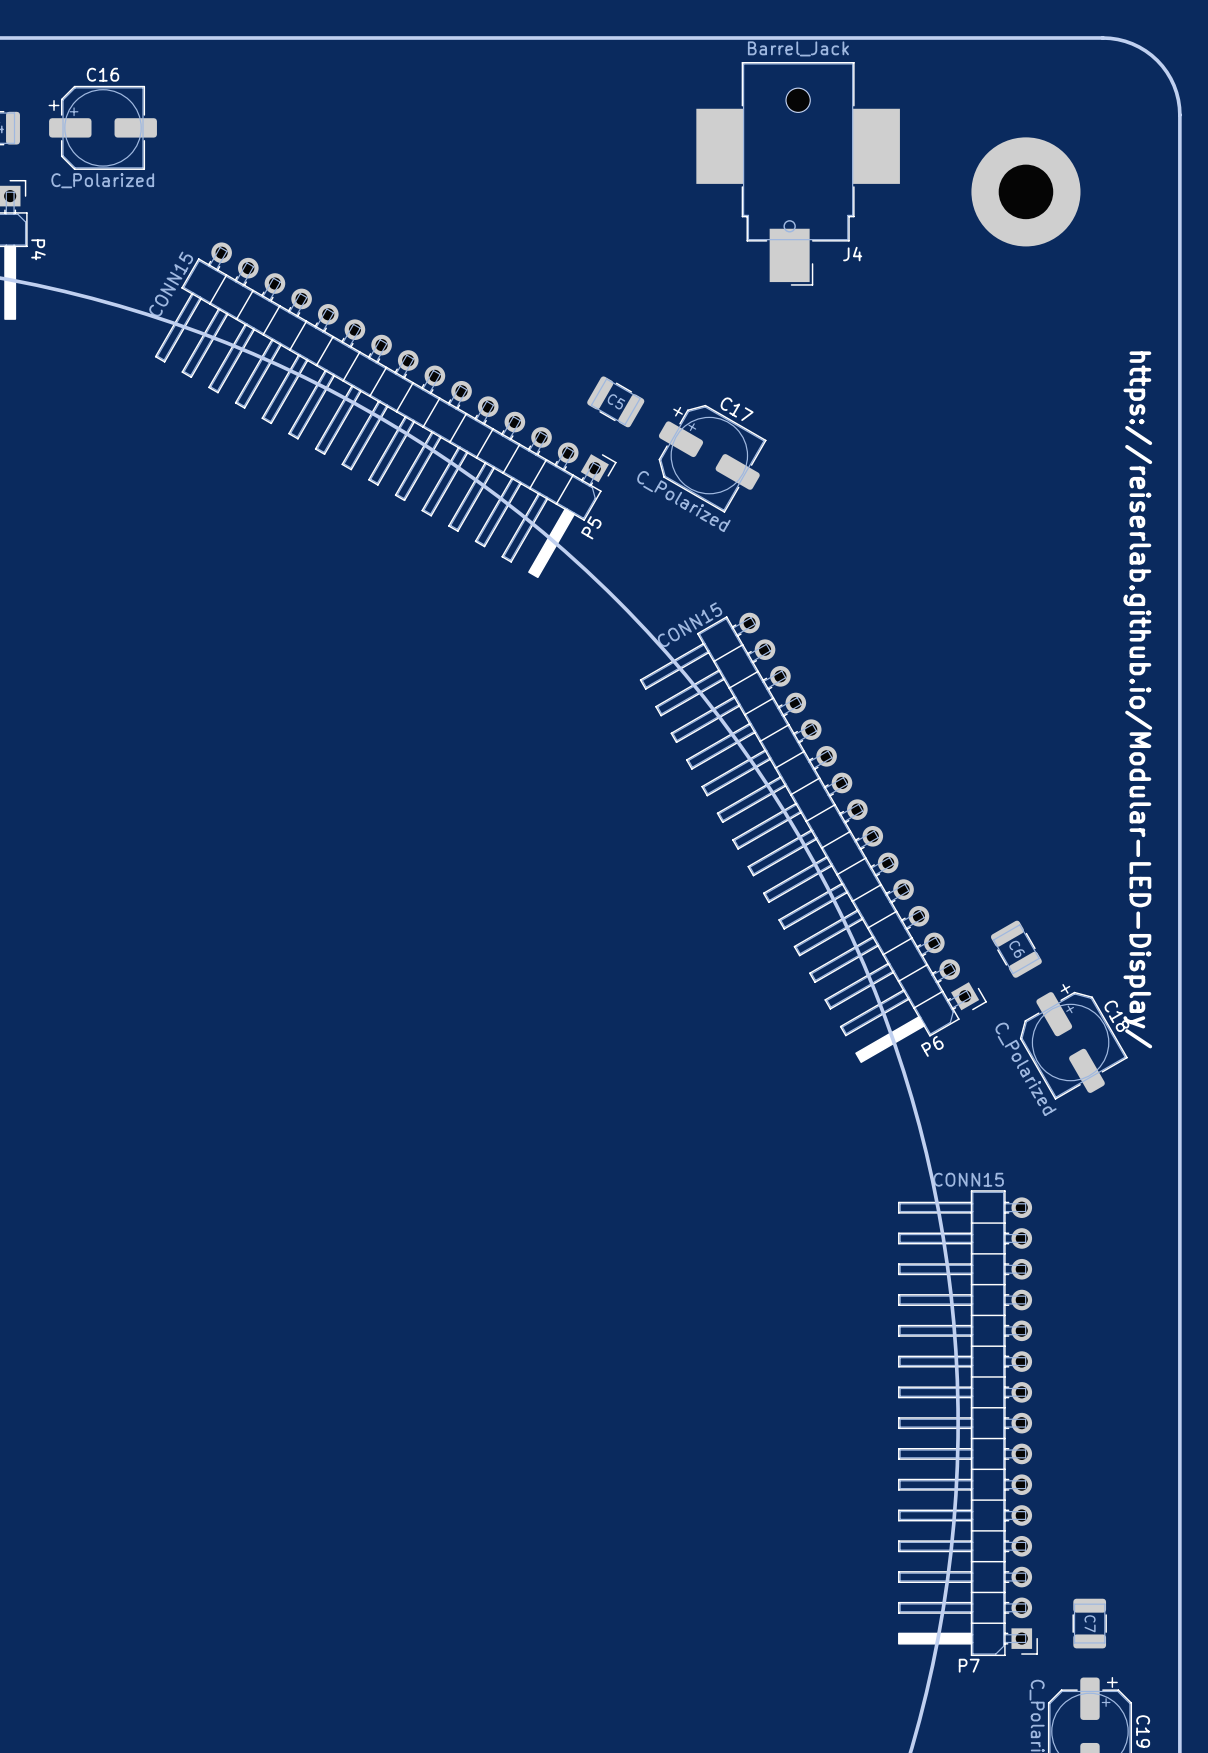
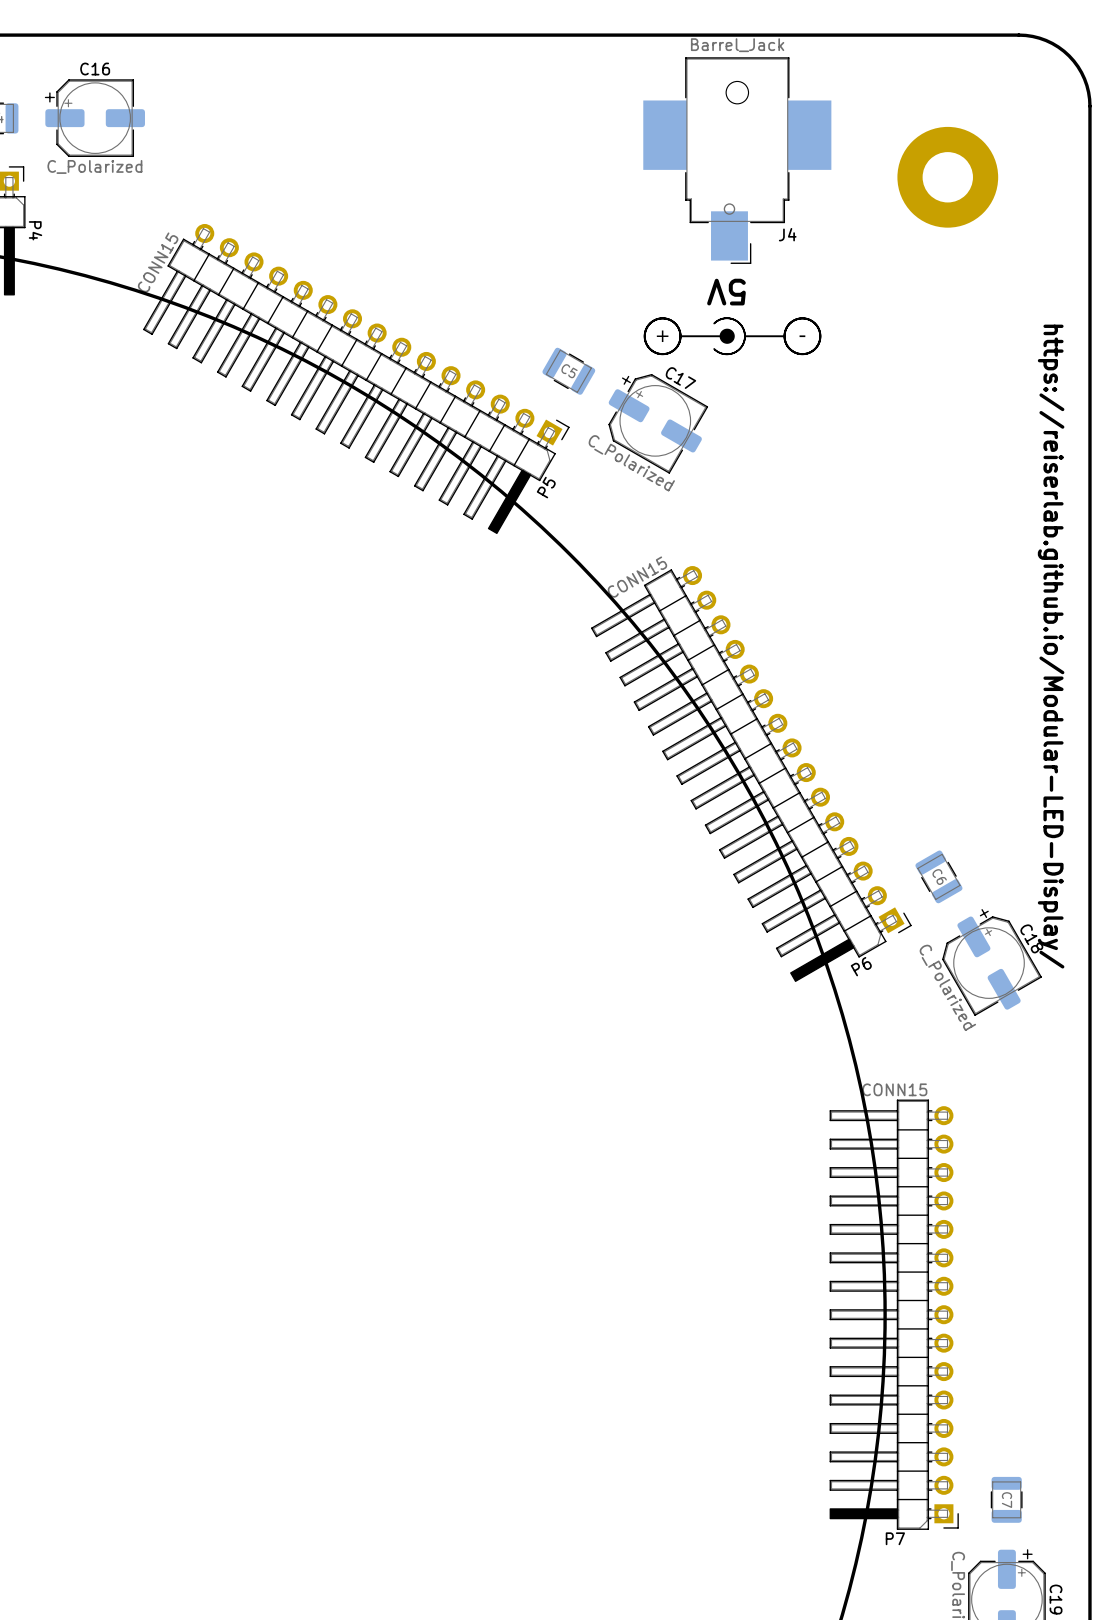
text: none -> 5V (726, 292)
line: none -> (663, 318) (650, 323) (644, 335) (649, 348) (661, 354) (674, 349) (680, 337) (675, 324) (663, 318)
line: none -> (803, 318) (815, 324) (820, 337) (814, 349) (801, 354) (789, 348) (784, 335) (790, 323) (803, 318)
line: none -> (714, 323) (723, 318) (733, 319) (741, 326) (744, 336) (741, 346) (733, 352) (723, 353) (714, 349)
drawing: none -> [719, 328, 735, 344]
drawing: none -> [656, 330, 669, 343]
line: none -> (719, 336) (681, 336)
line: none -> (783, 336) (745, 336)
drawing: none -> [799, 335, 806, 338]

